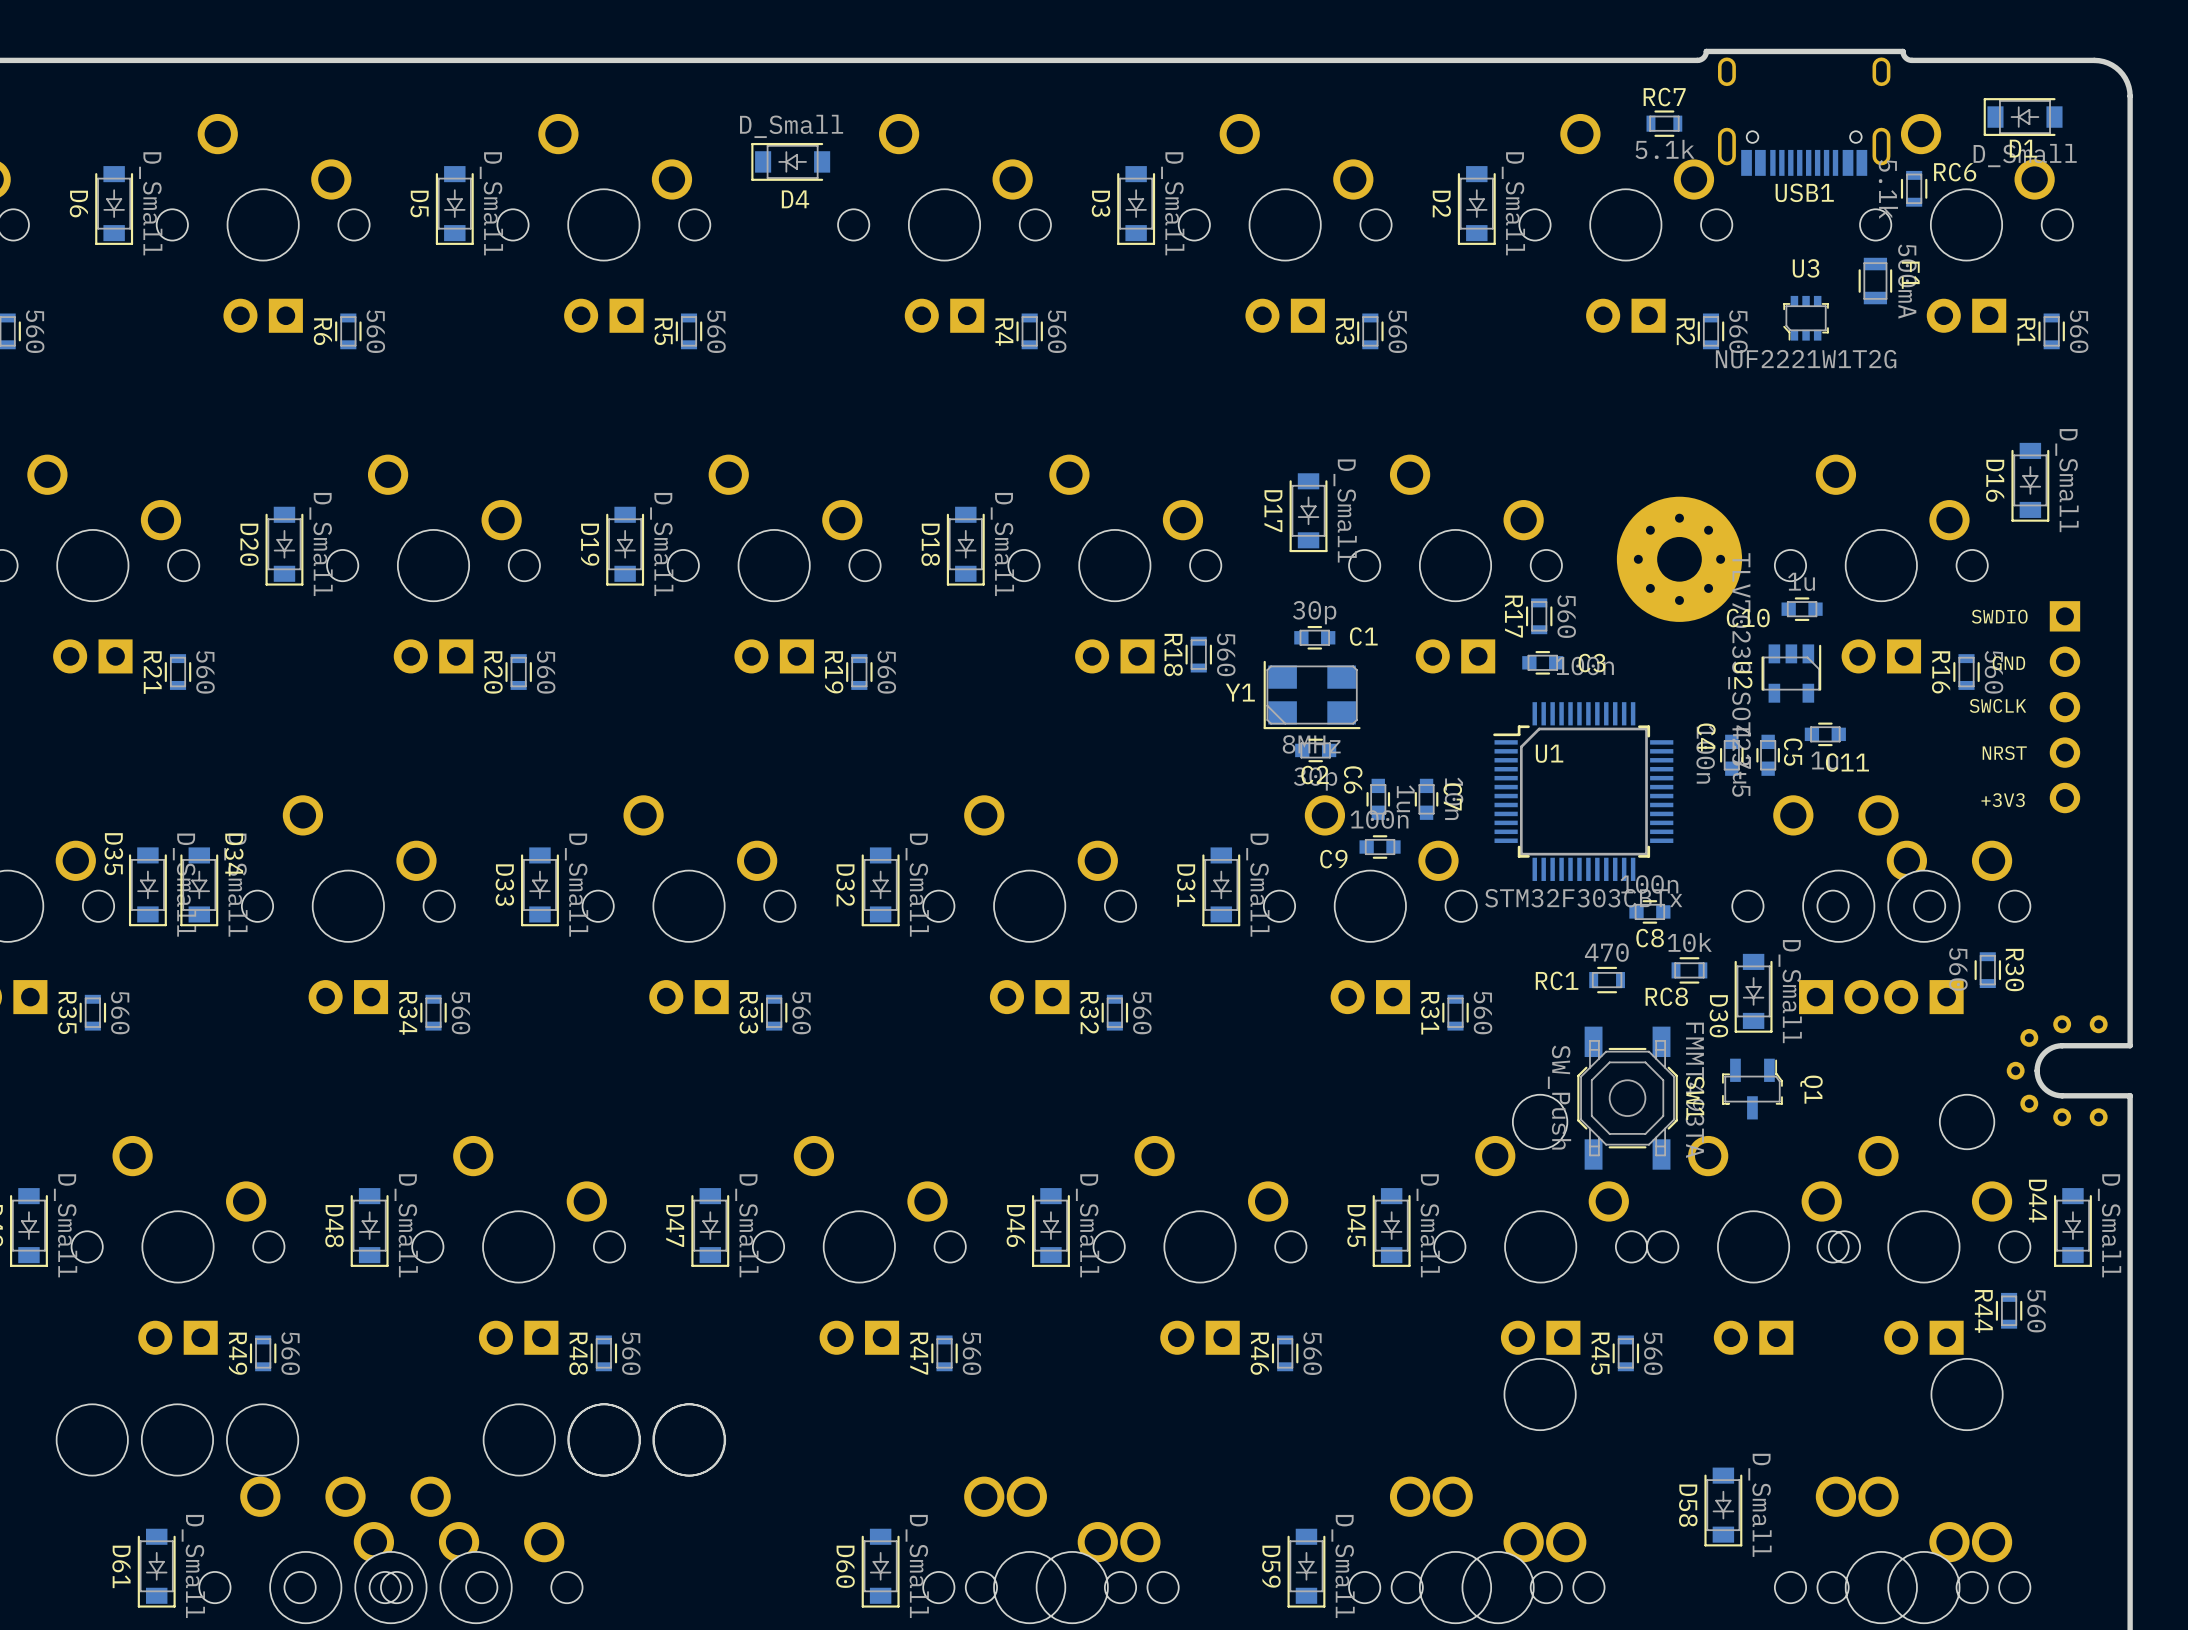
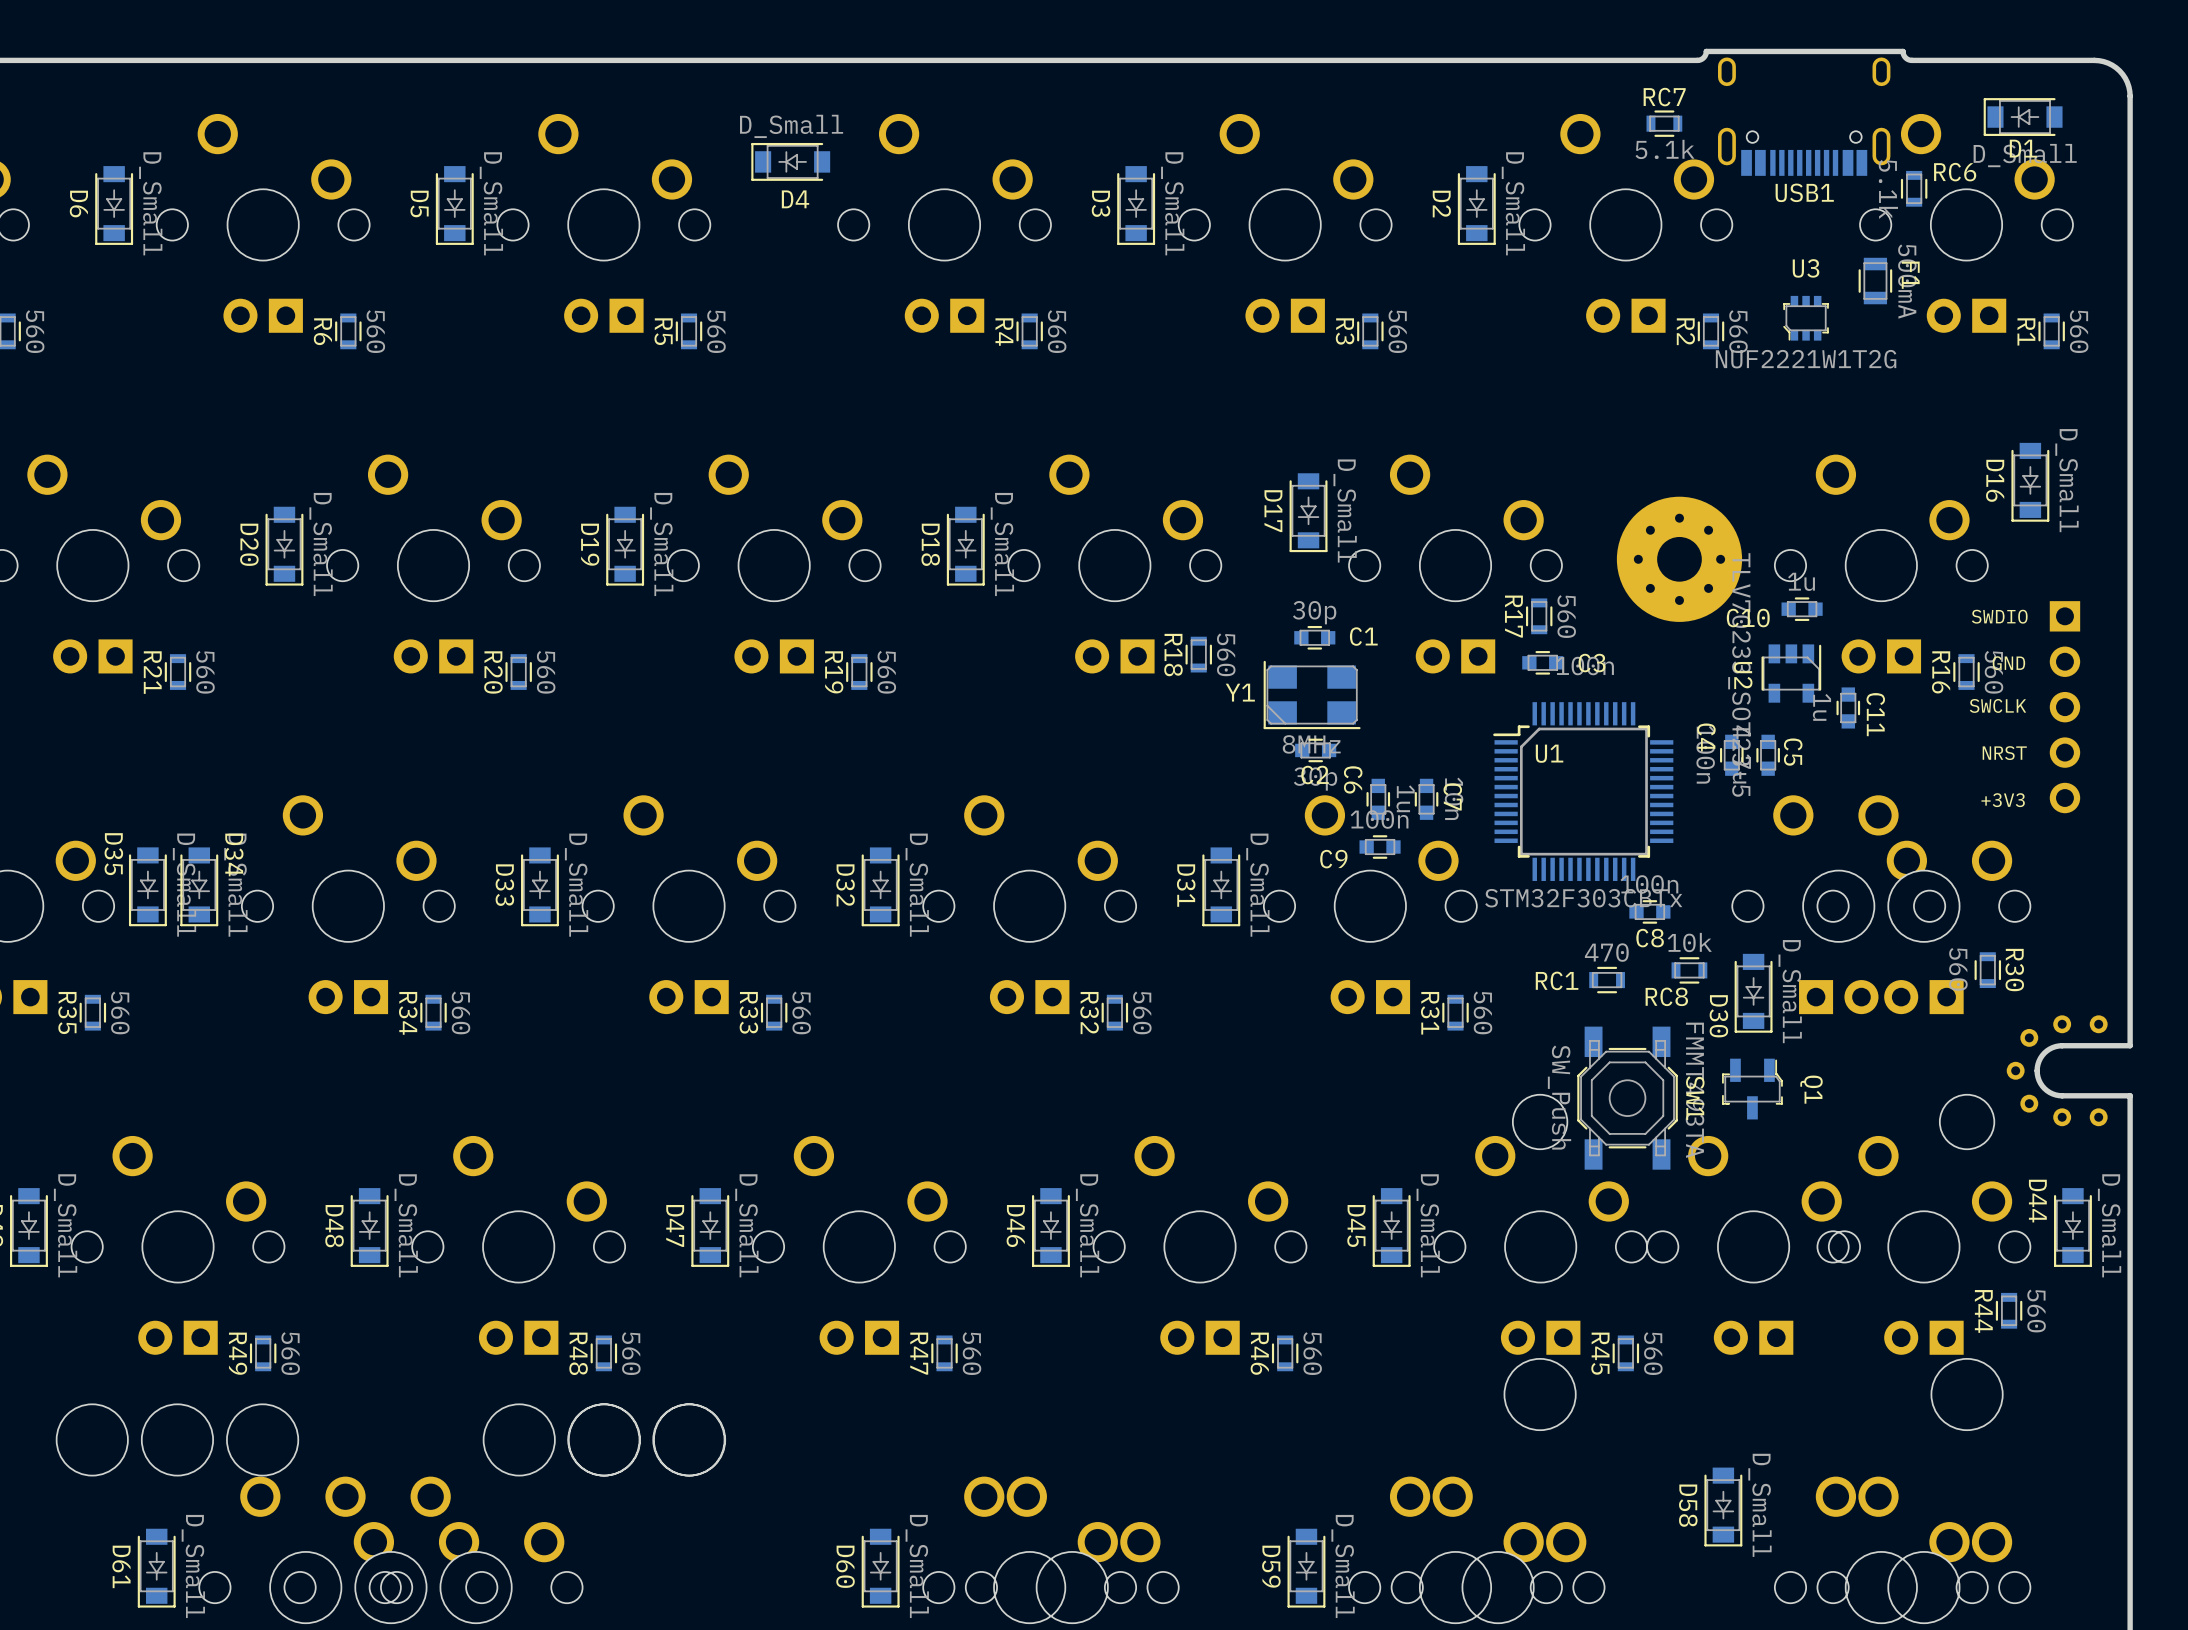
C11 rotation: 0° (1825, 734) -> 90° clockwise (1848, 707)
C11 position: (1825, 734) -> (1848, 707)

